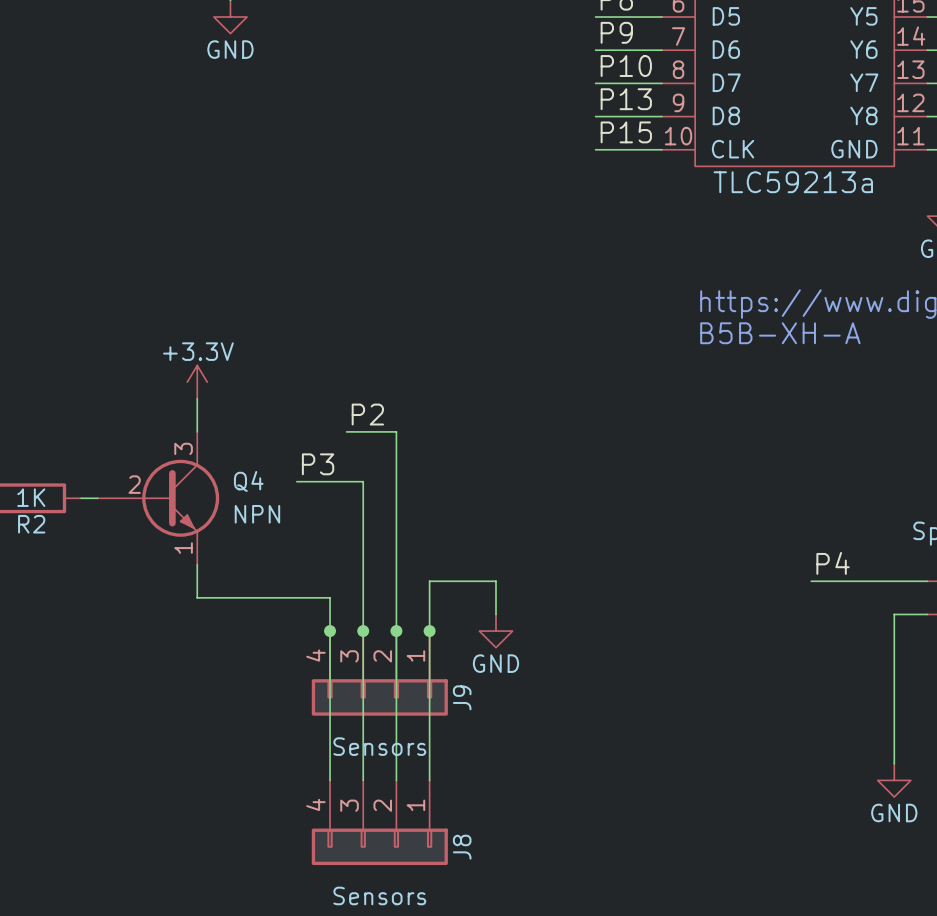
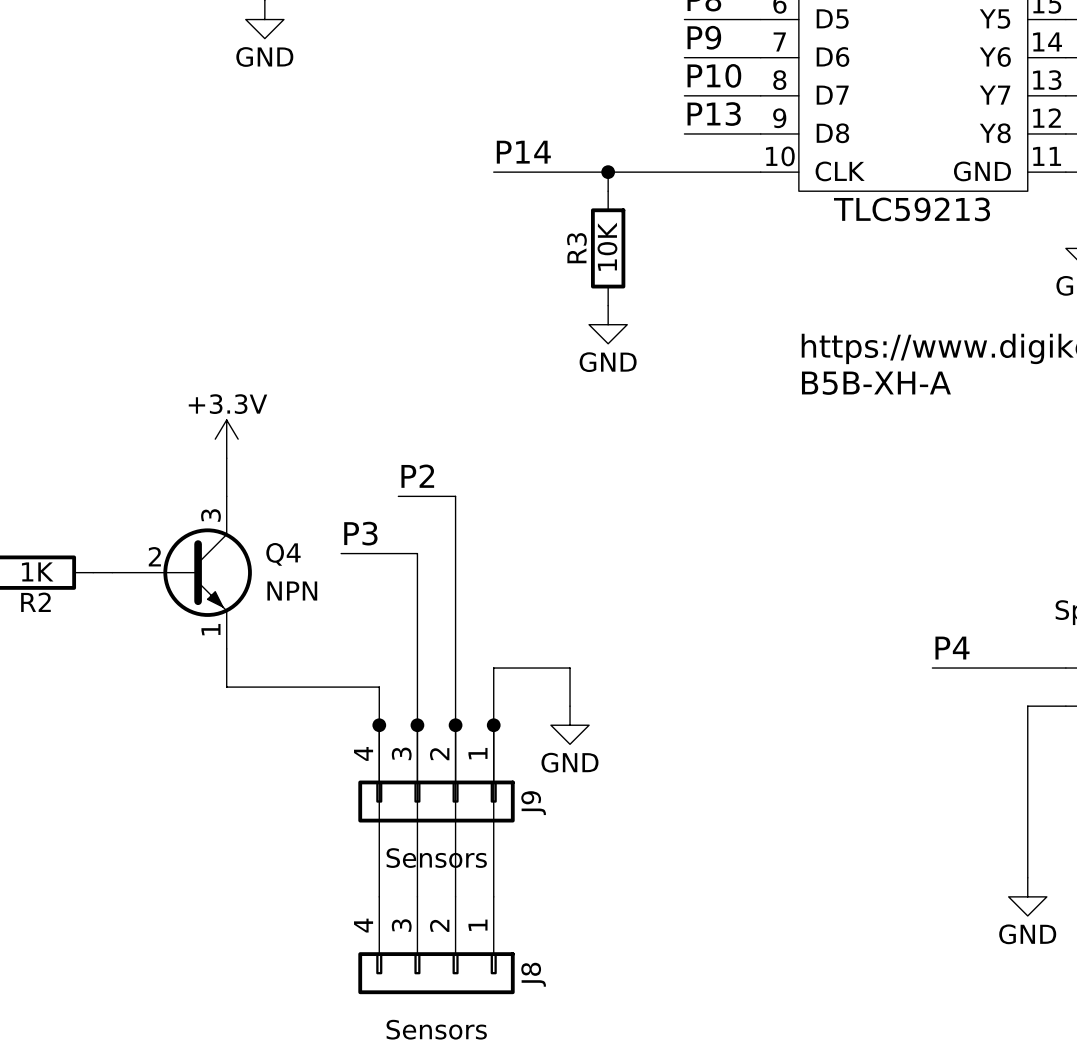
label: none -> P14 (523, 152)
label: P15 (626, 132) -> none
wire: none -> (493, 172) (684, 172)
wire: none -> (608, 172) (608, 191)
junction: none -> (608, 172)
part value: TLC59213a (793, 182) -> TLC59213 (912, 209)
R3: none -> 10K (608, 248)
power symbol: none -> GND (608, 324)

